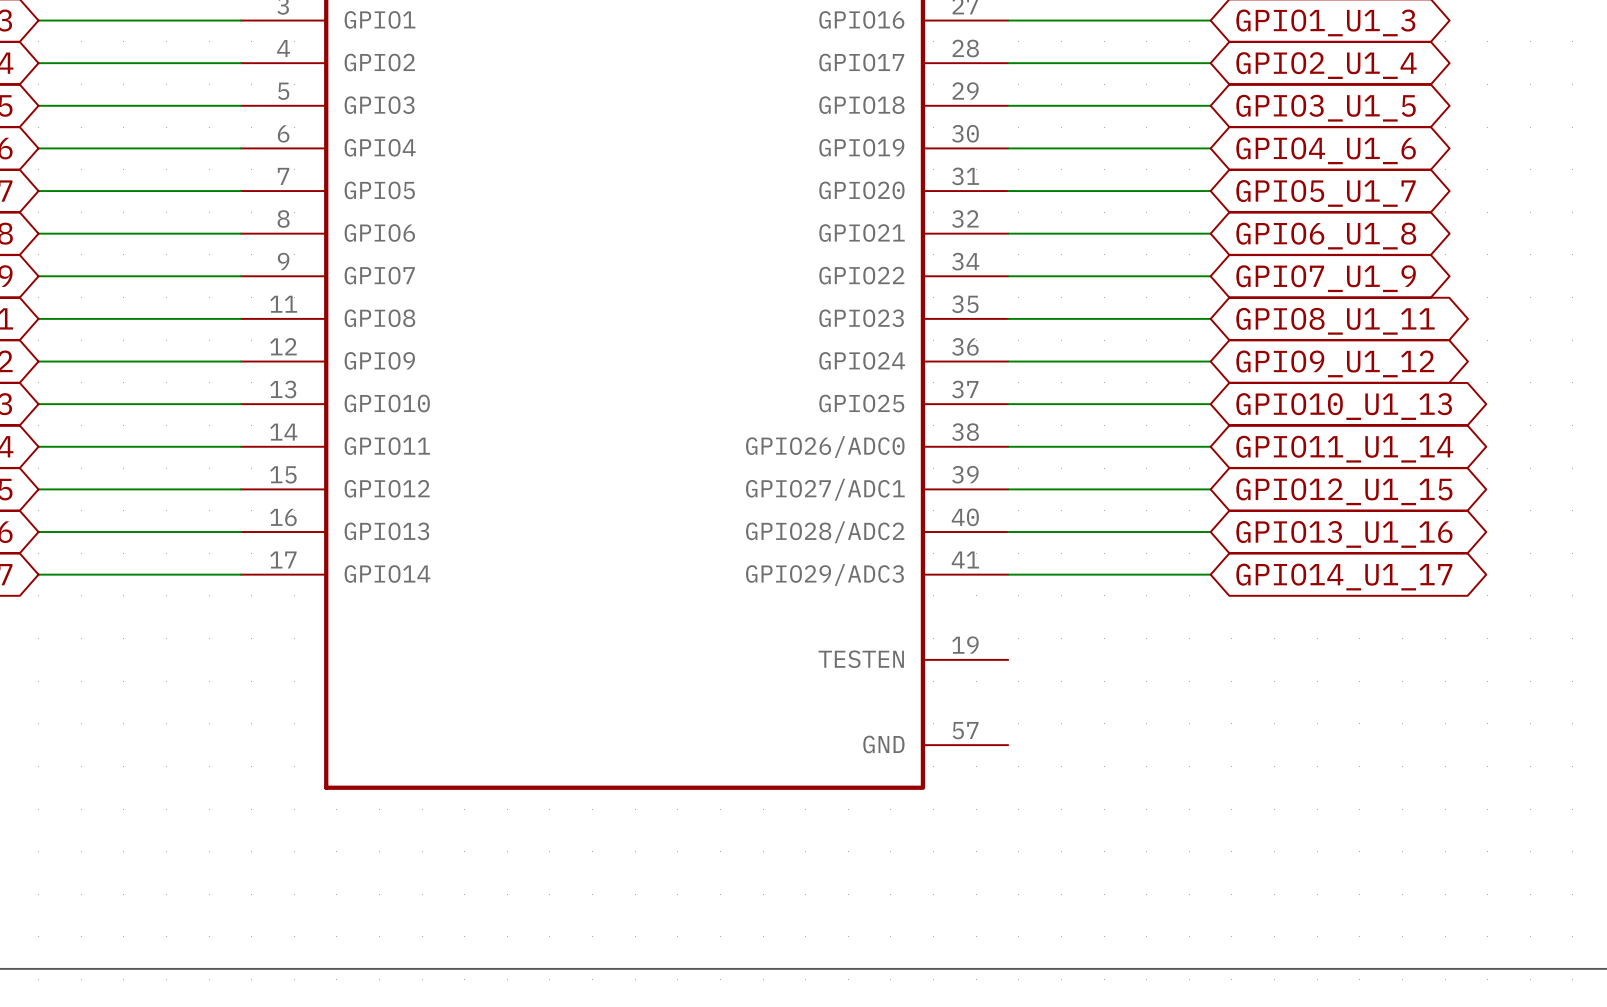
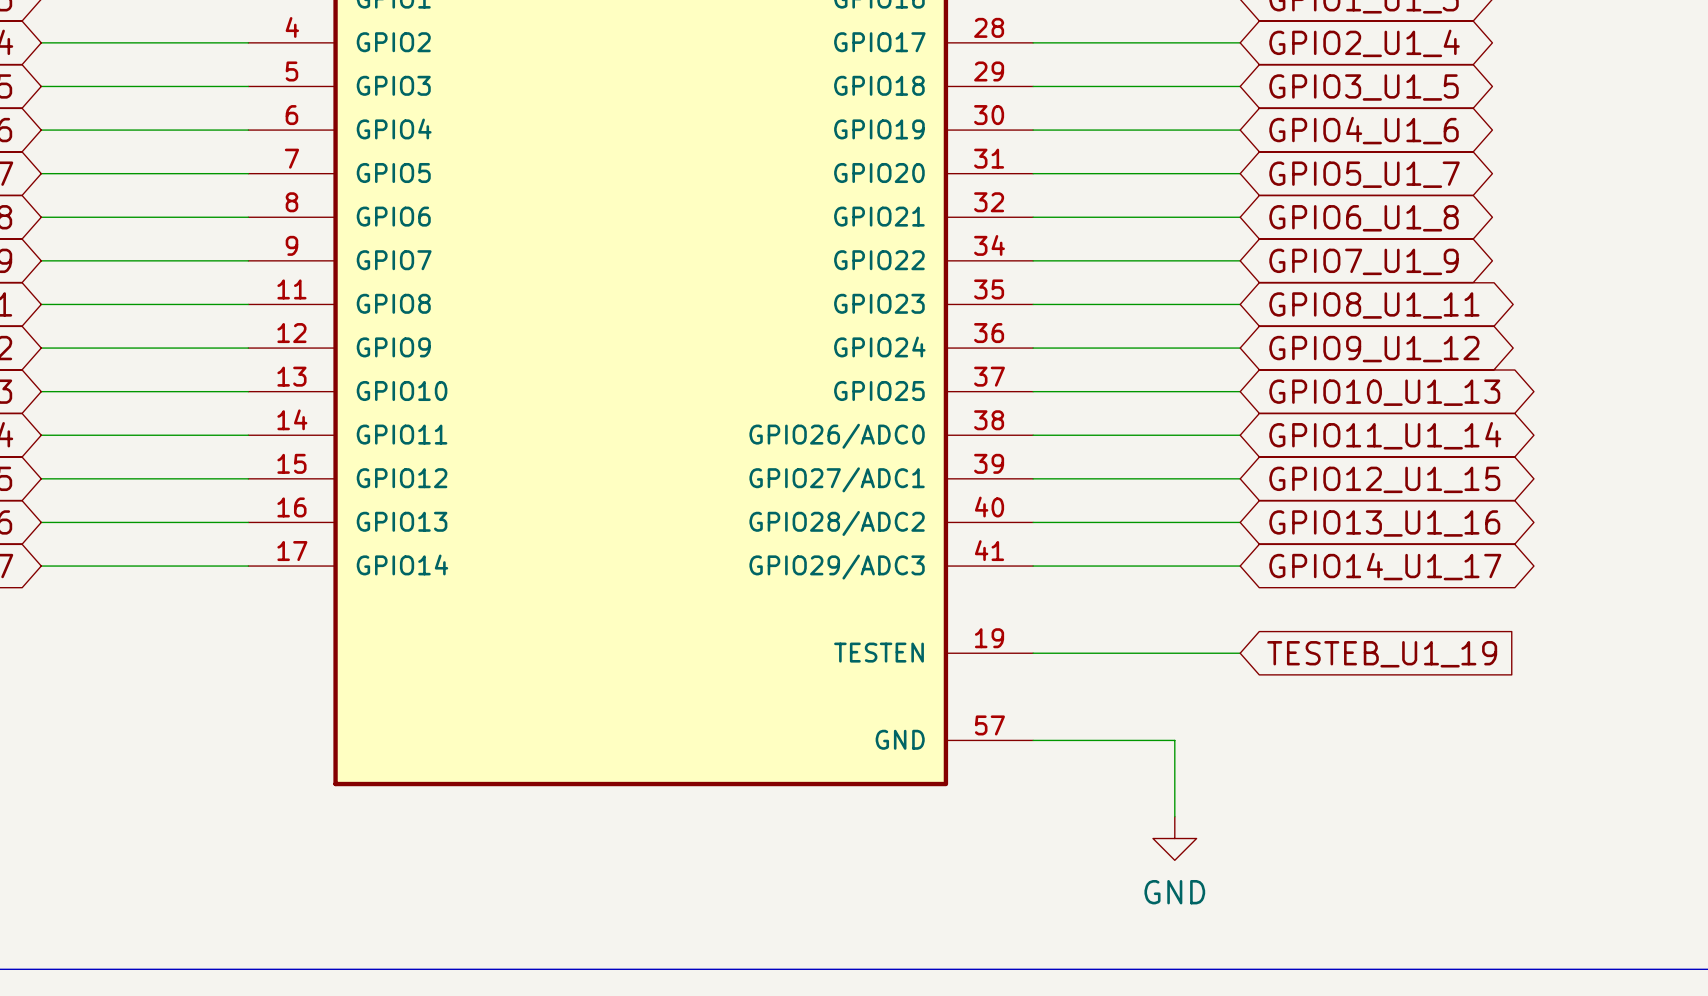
wire: none -> (1033, 653) (1240, 653)
global label: none -> TESTEB_U1_19 (1382, 654)
wire: none -> (1033, 740) (1174, 740) (1174, 816)
power symbol: none -> GND (1174, 838)

